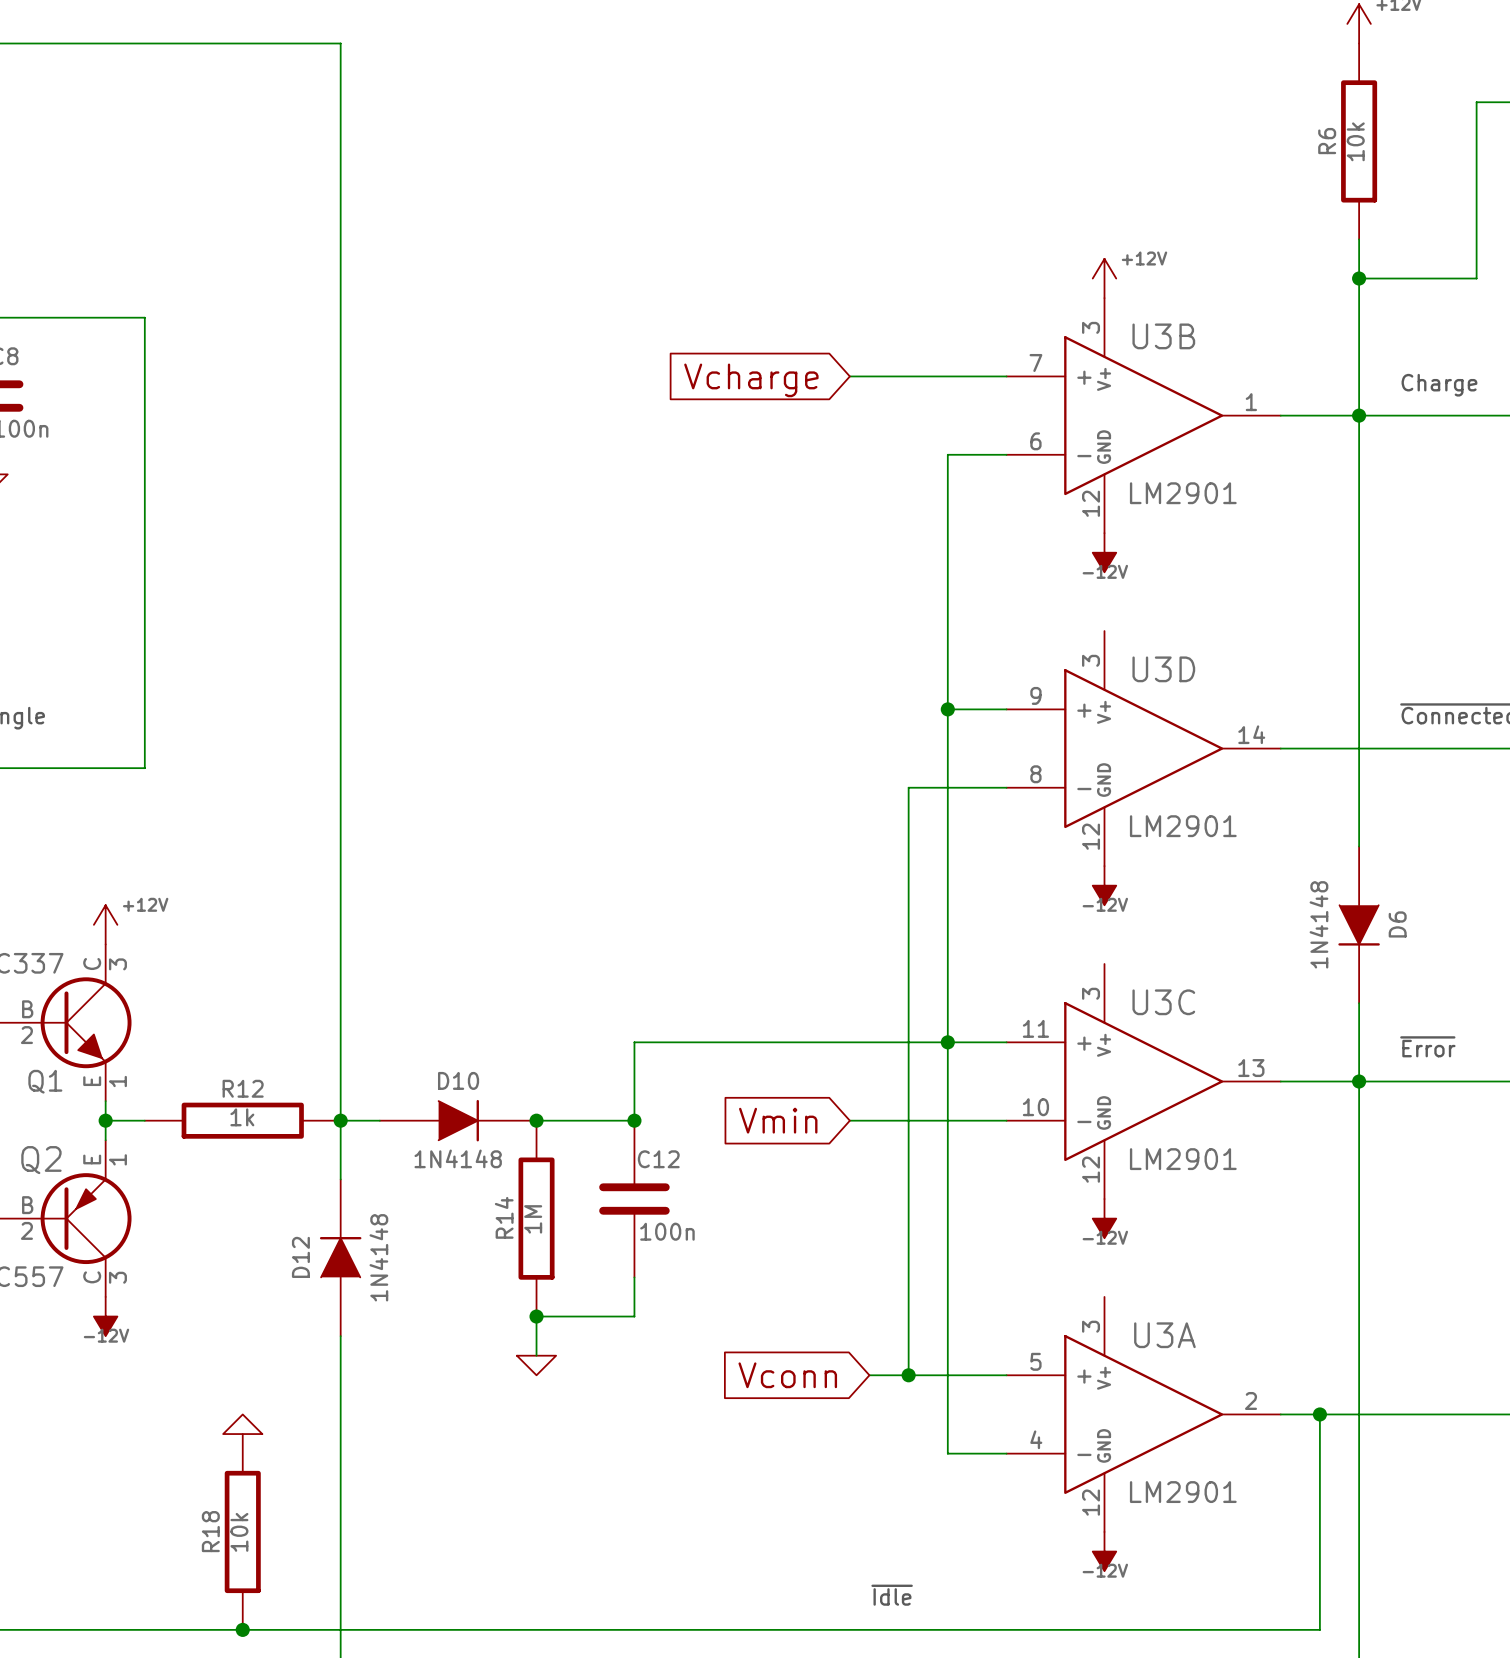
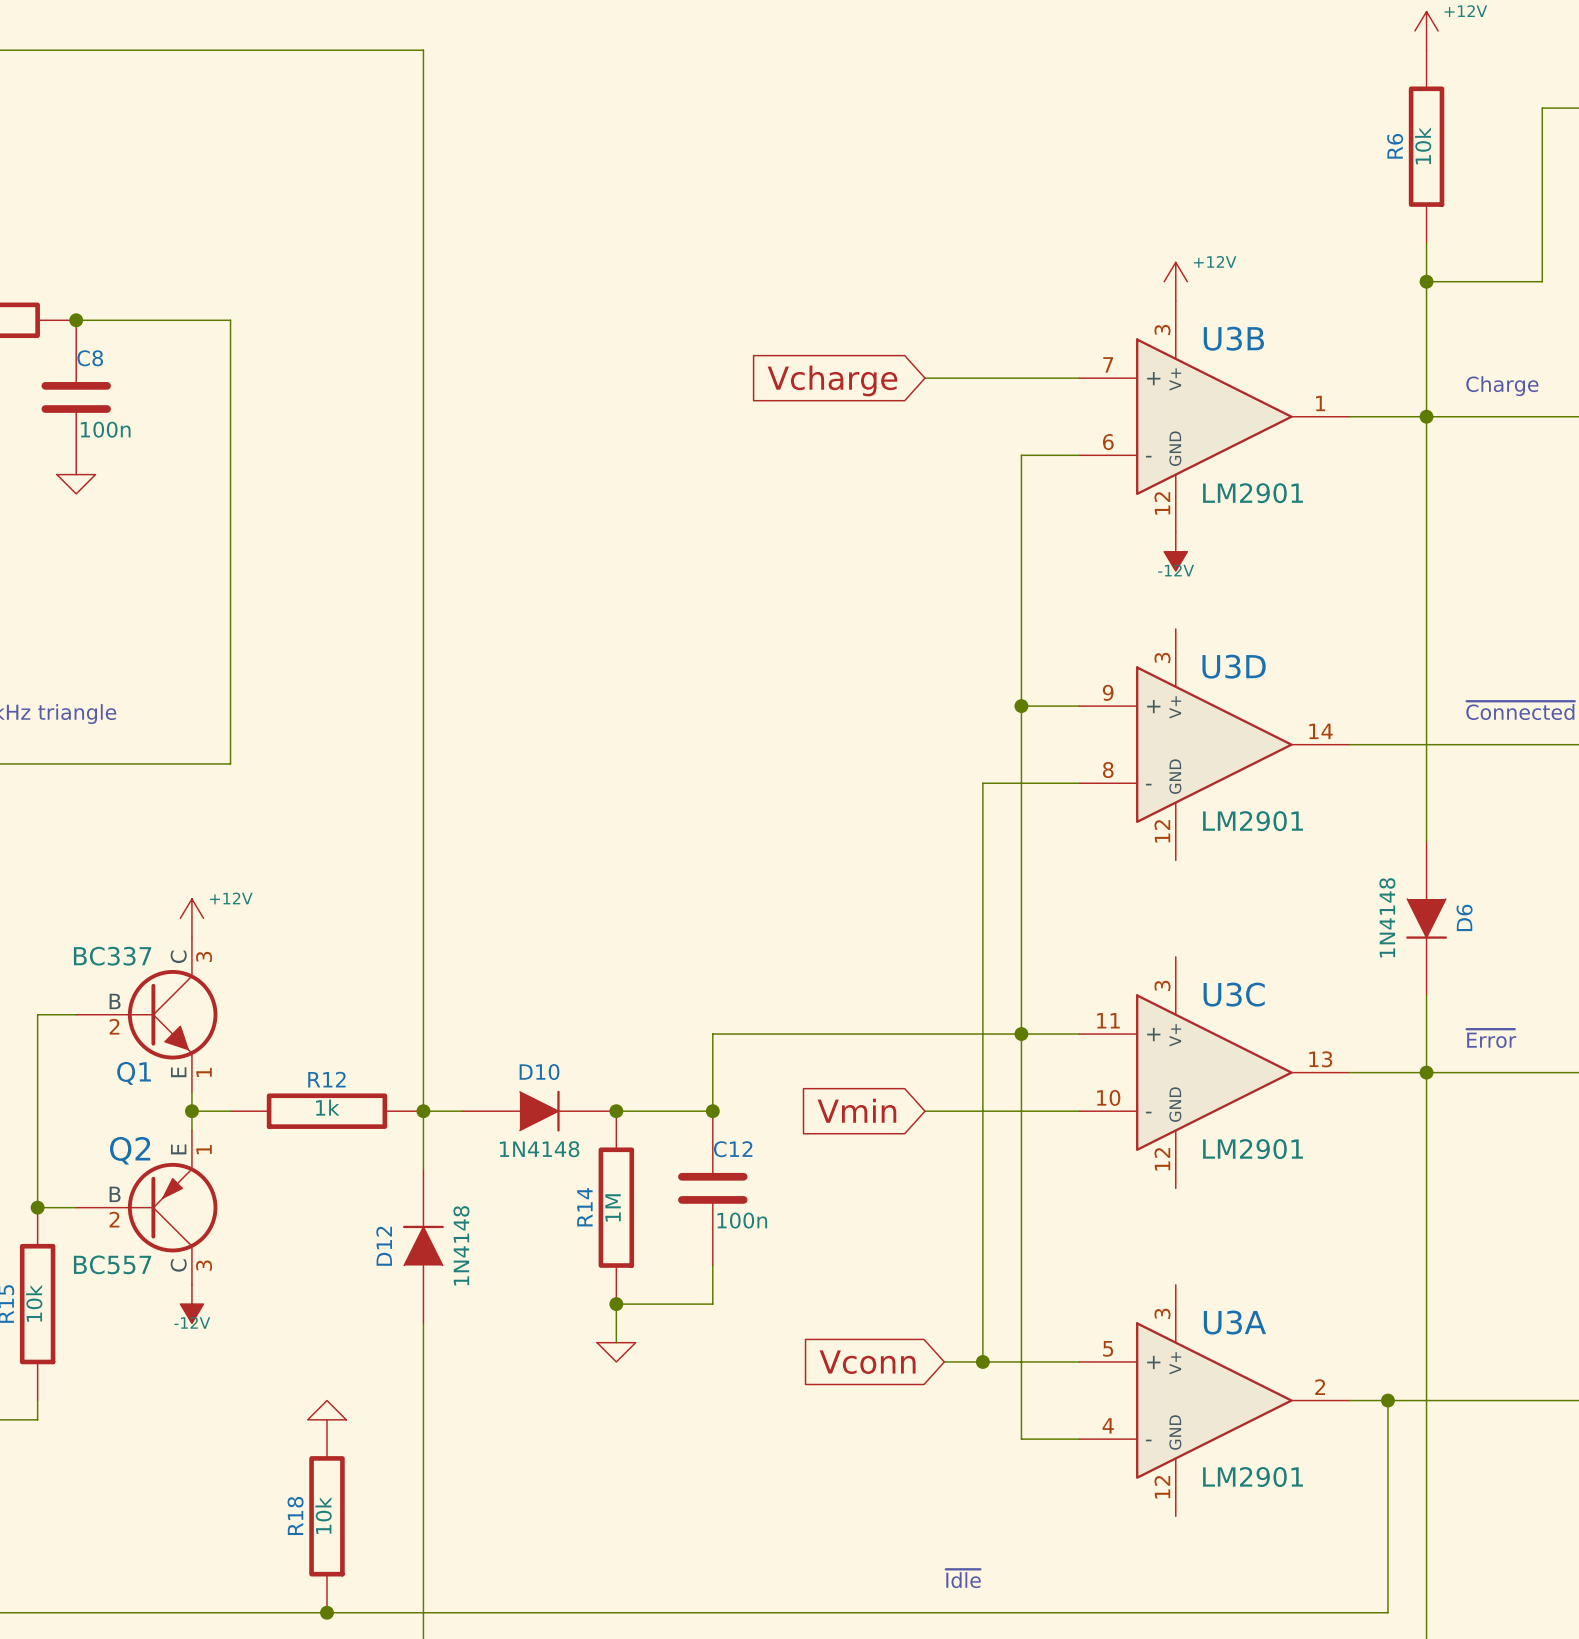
power symbol: -12V (1104, 885) -> none
power symbol: -12V (1104, 1218) -> none
power symbol: -12V (1104, 1551) -> none

